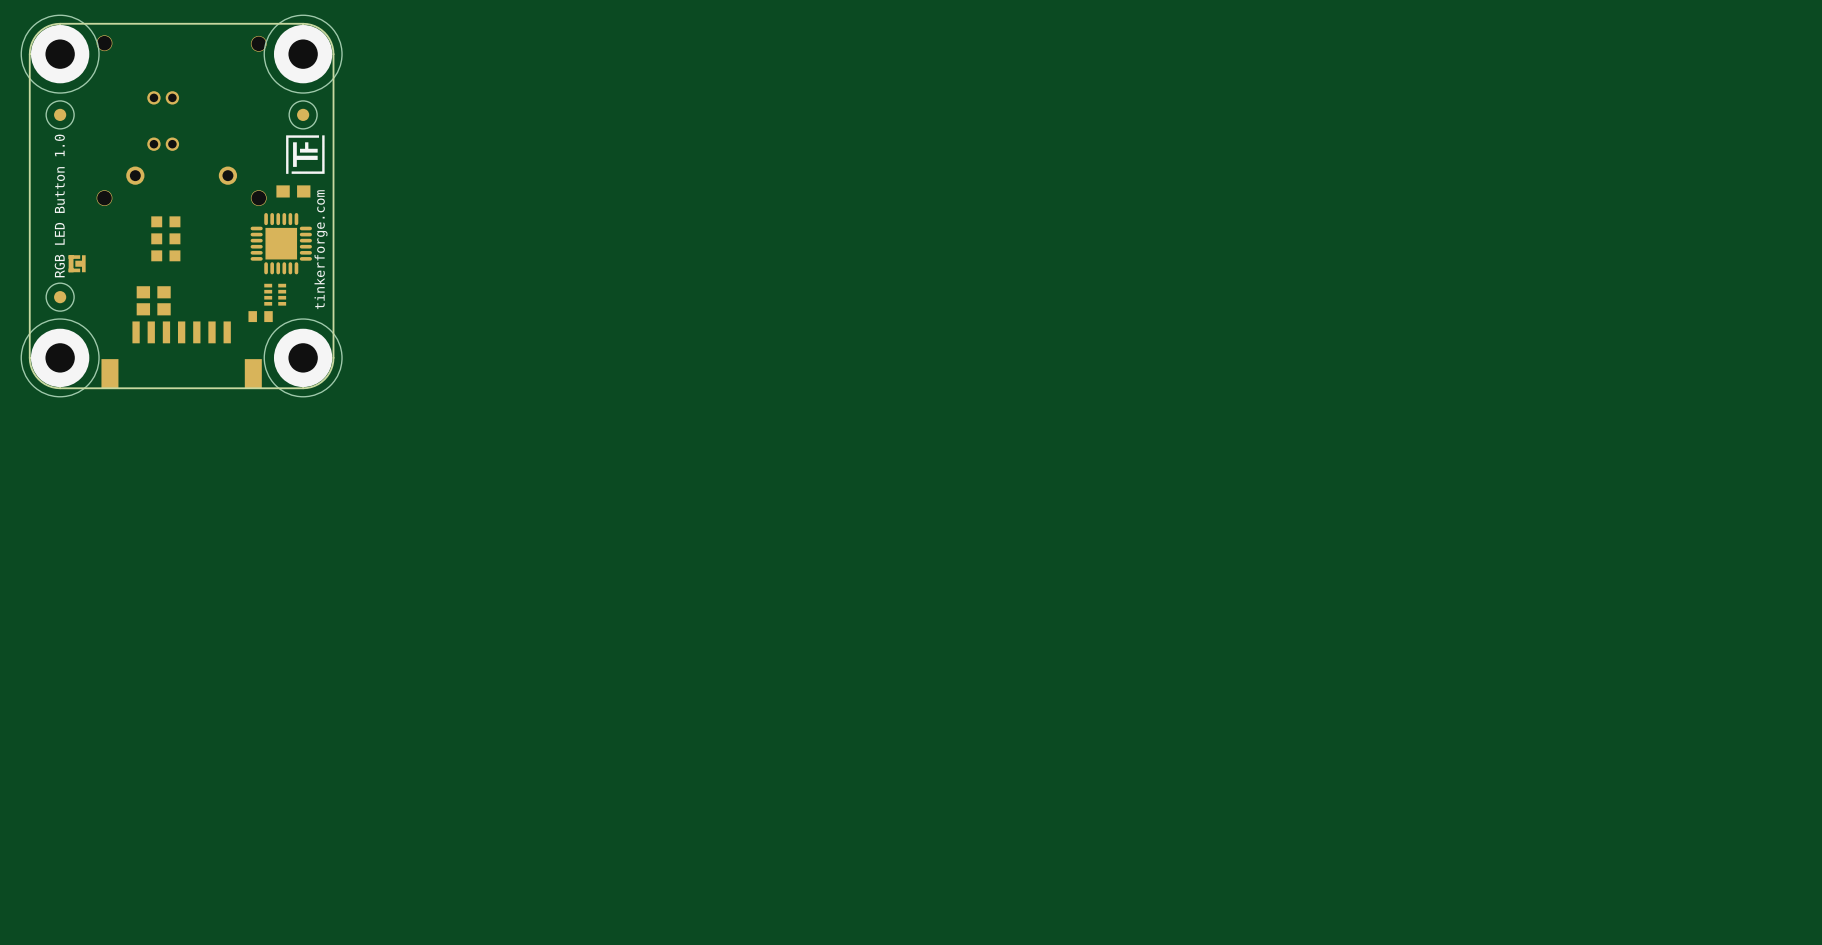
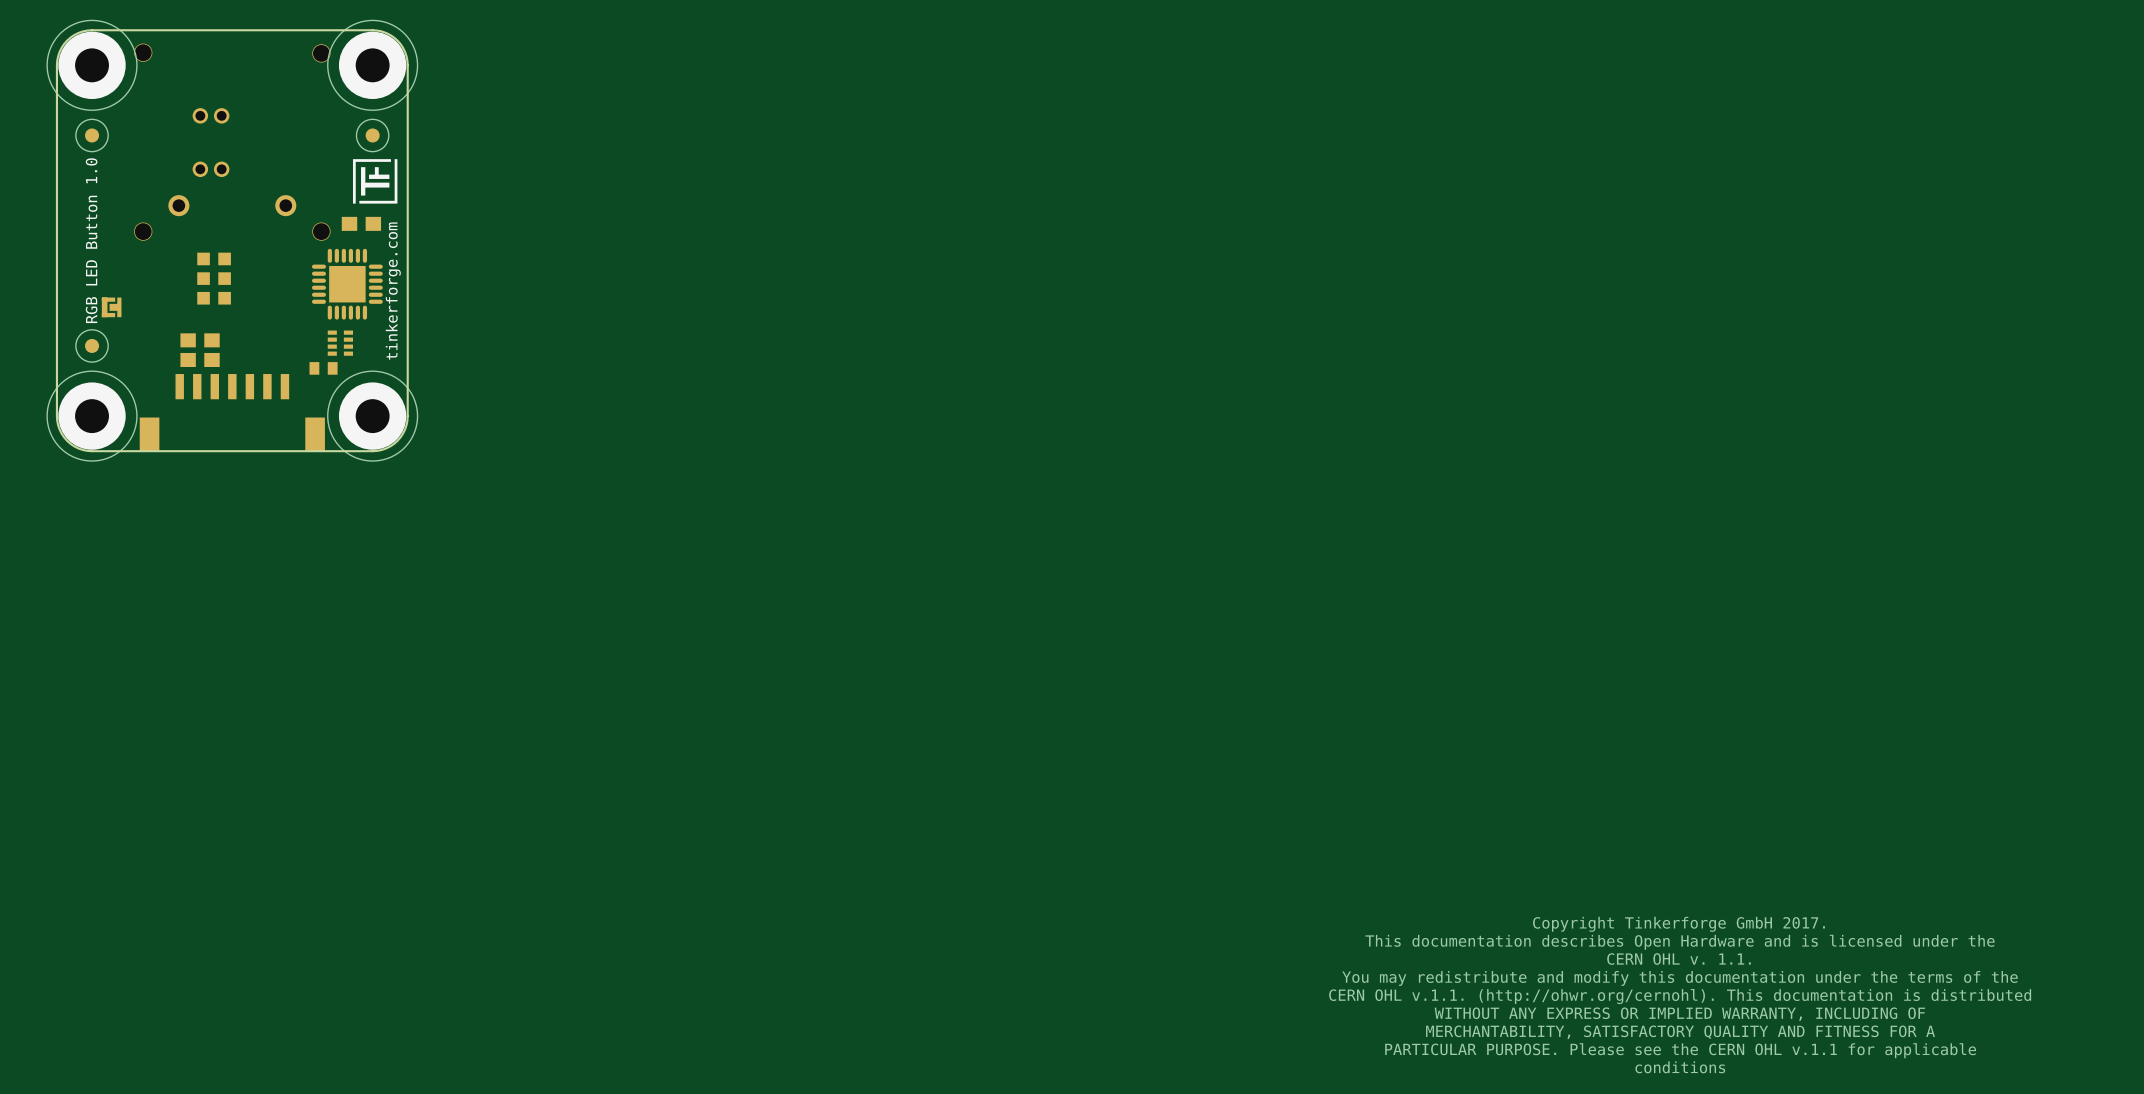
text: none -> Copyright Tinkerforge GmbH 2017. (1679, 924)
text: none -> This documentation describes Open Hardware and is licensed under the (1680, 942)
text: none -> CERN OHL v. 1.1. (1679, 959)
text: none -> You may redistribute and modify this documentation under the terms of the (1680, 978)
text: none -> CERN OHL v.1.1. (http://ohwr.org/cernohl). This documentation is distributed (1680, 996)
text: none -> WITHOUT ANY EXPRESS OR IMPLIED WARRANTY, INCLUDING OF (1679, 1014)
text: none -> MERCHANTABILITY, SATISFACTORY QUALITY AND FITNESS FOR A (1680, 1032)
text: none -> PARTICULAR PURPOSE. Please see the CERN OHL v.1.1 for applicable (1680, 1050)
text: none -> conditions (1680, 1067)

